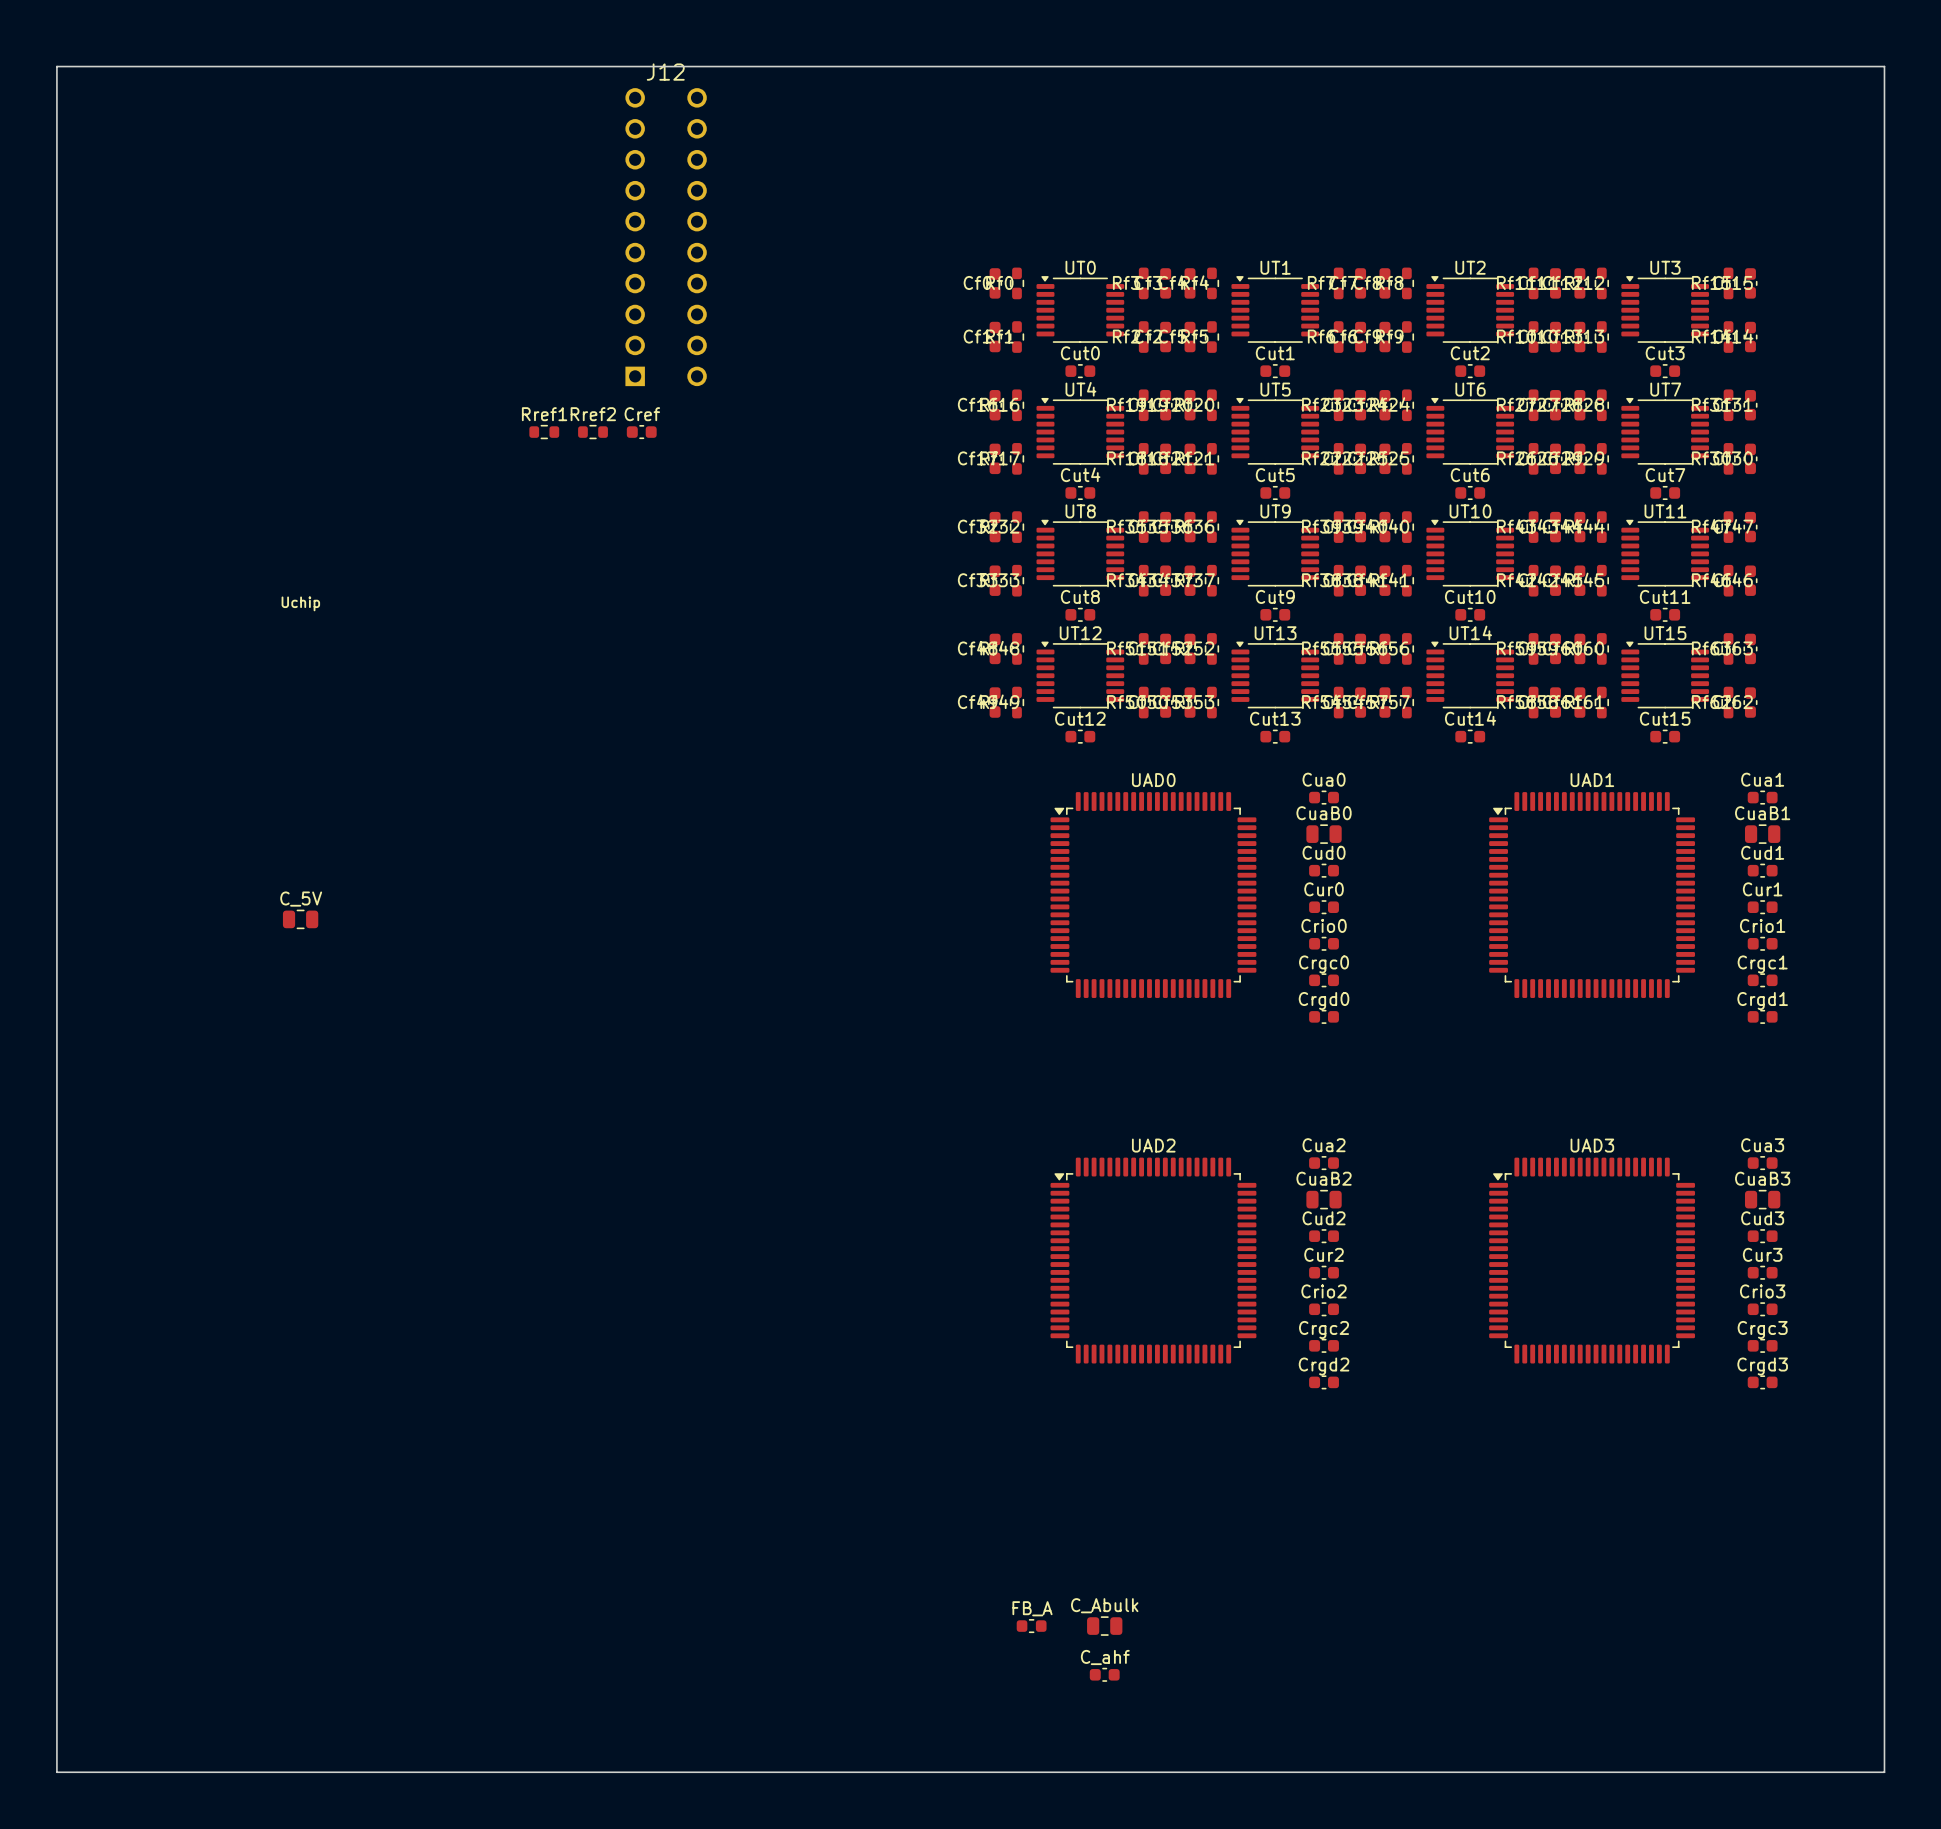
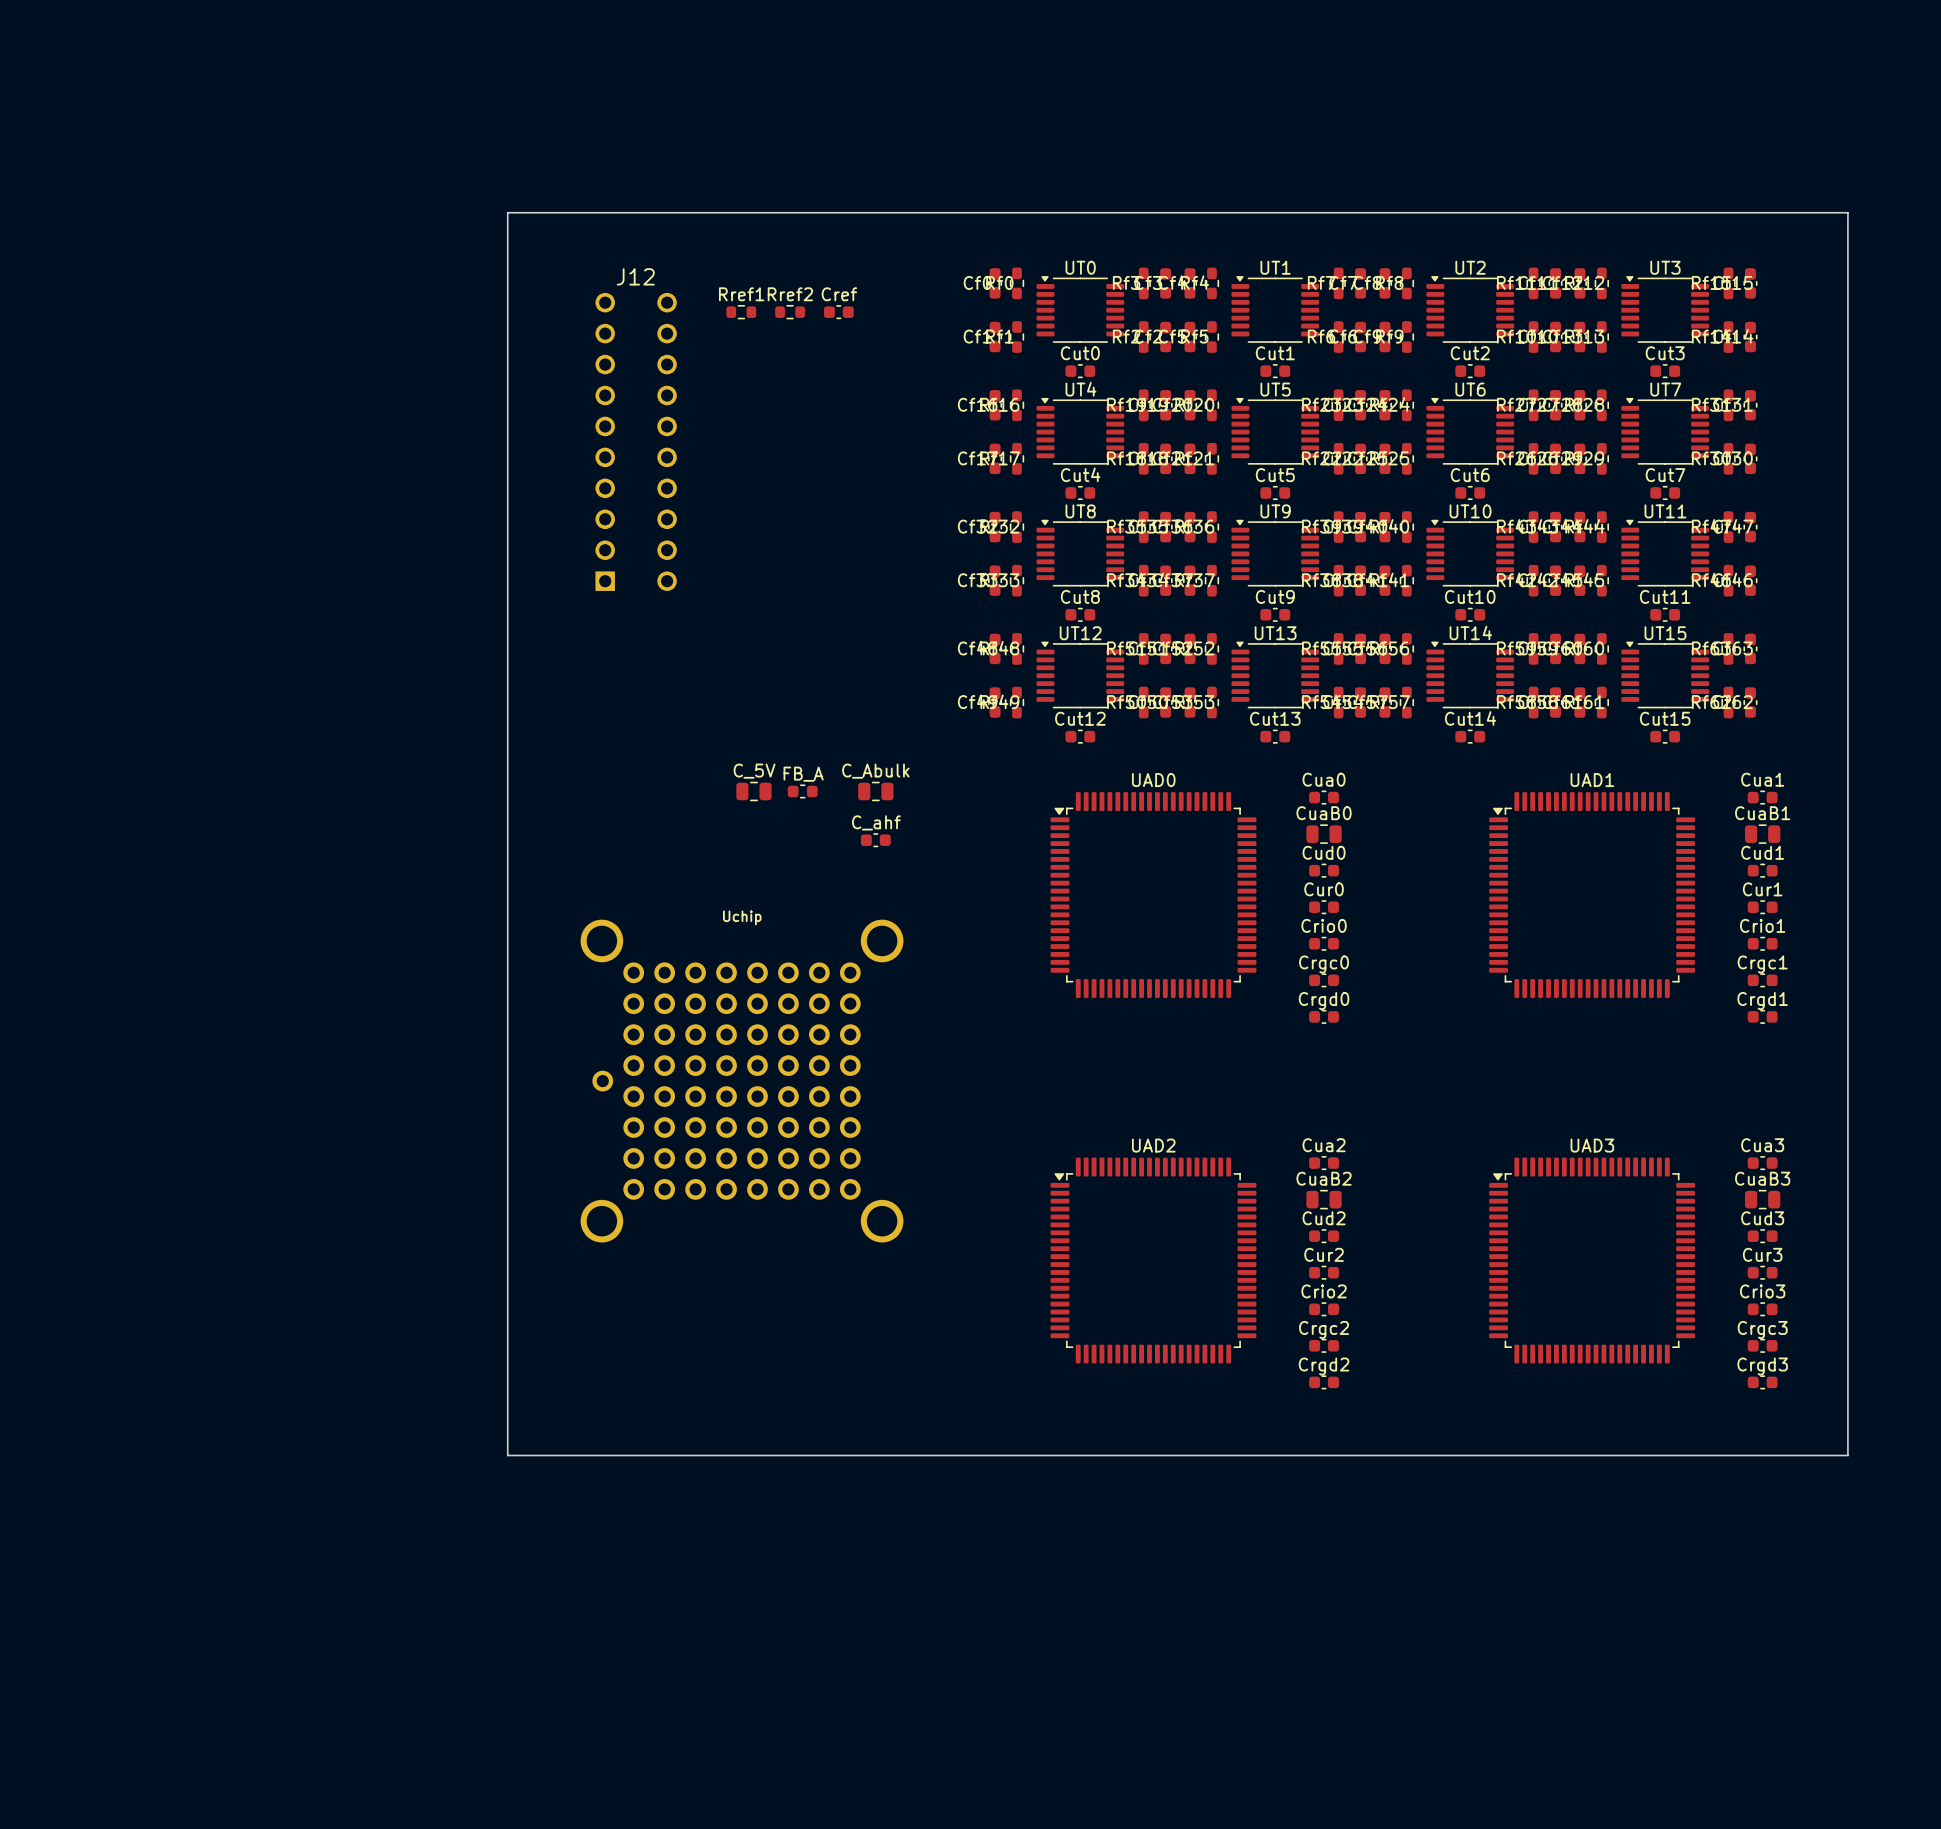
board edge: (56, 66) (1884, 66) (1884, 1772) (56, 1772) (56, 66) -> (507, 212) (507, 1455) (1847, 1455) (1847, 212) (507, 212)
J12 position: (666, 237) -> (636, 441)
Rref1 position: (544, 432) -> (741, 312)
Rref2 position: (593, 432) -> (790, 312)
Cref position: (641, 432) -> (838, 312)
Uchip: (300, 603) -> none
FB_A: none -> (802, 791)
C_Abulk: none -> (875, 791)
C_ahf: none -> (875, 840)
C_5V position: (300, 919) -> (753, 791)
Uchip: none -> (742, 1081)
FB_A: (1031, 1626) -> none
C_Abulk: (1104, 1626) -> none
C_ahf: (1104, 1674) -> none

